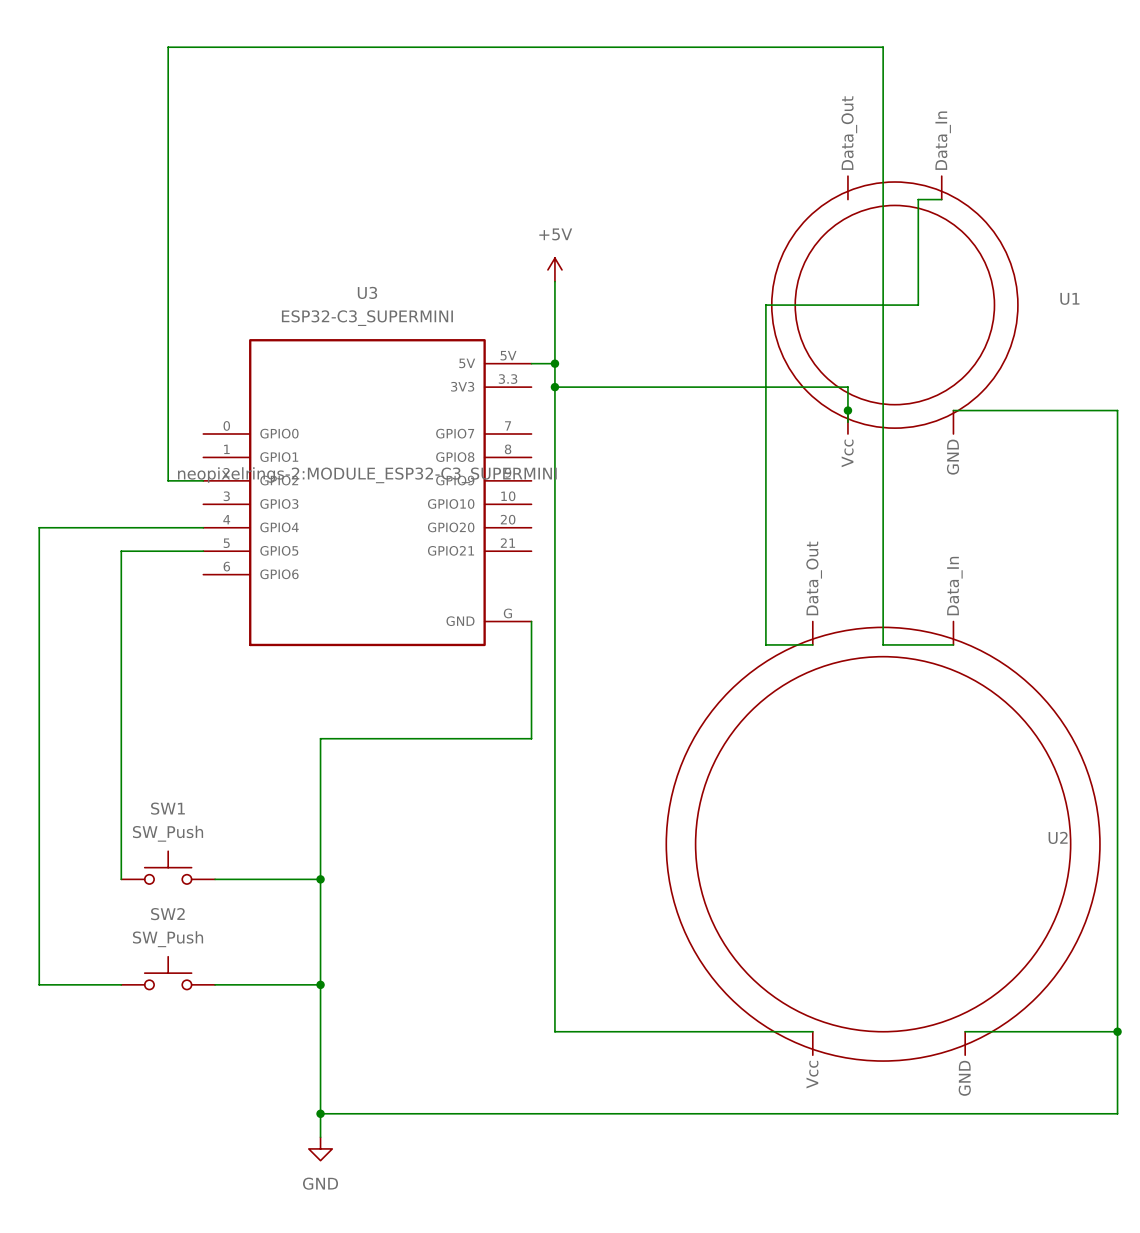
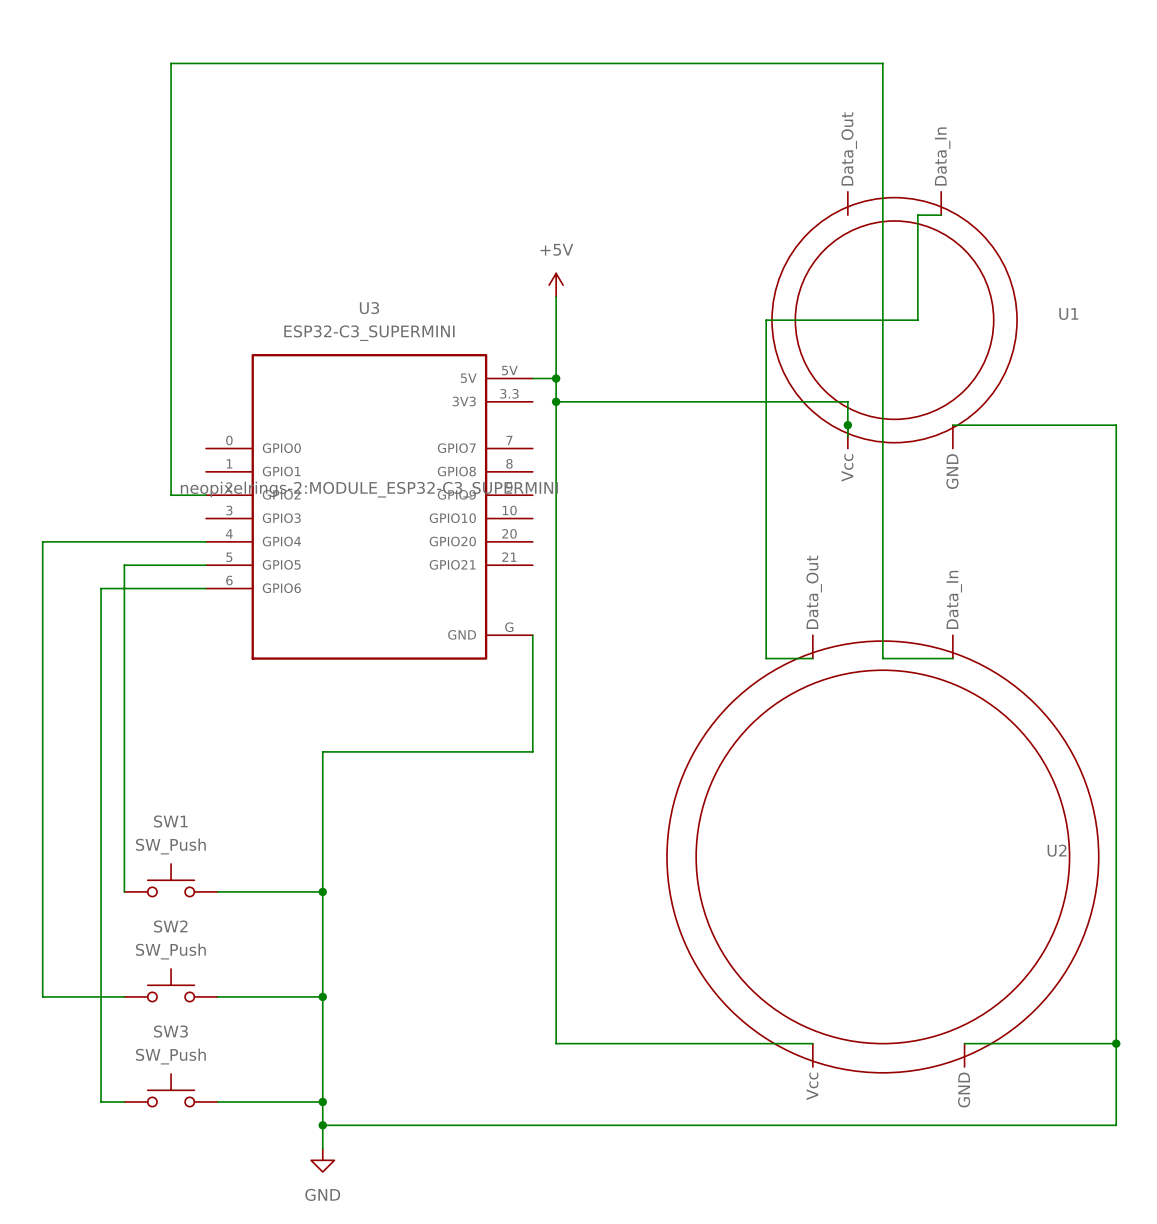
wire: none -> (206, 588) (101, 588) (101, 1101) (124, 1101)
SW3: none -> SW_Push (171, 1090)
wire: none -> (217, 1101) (322, 1101)
junction: none -> (322, 1101)

